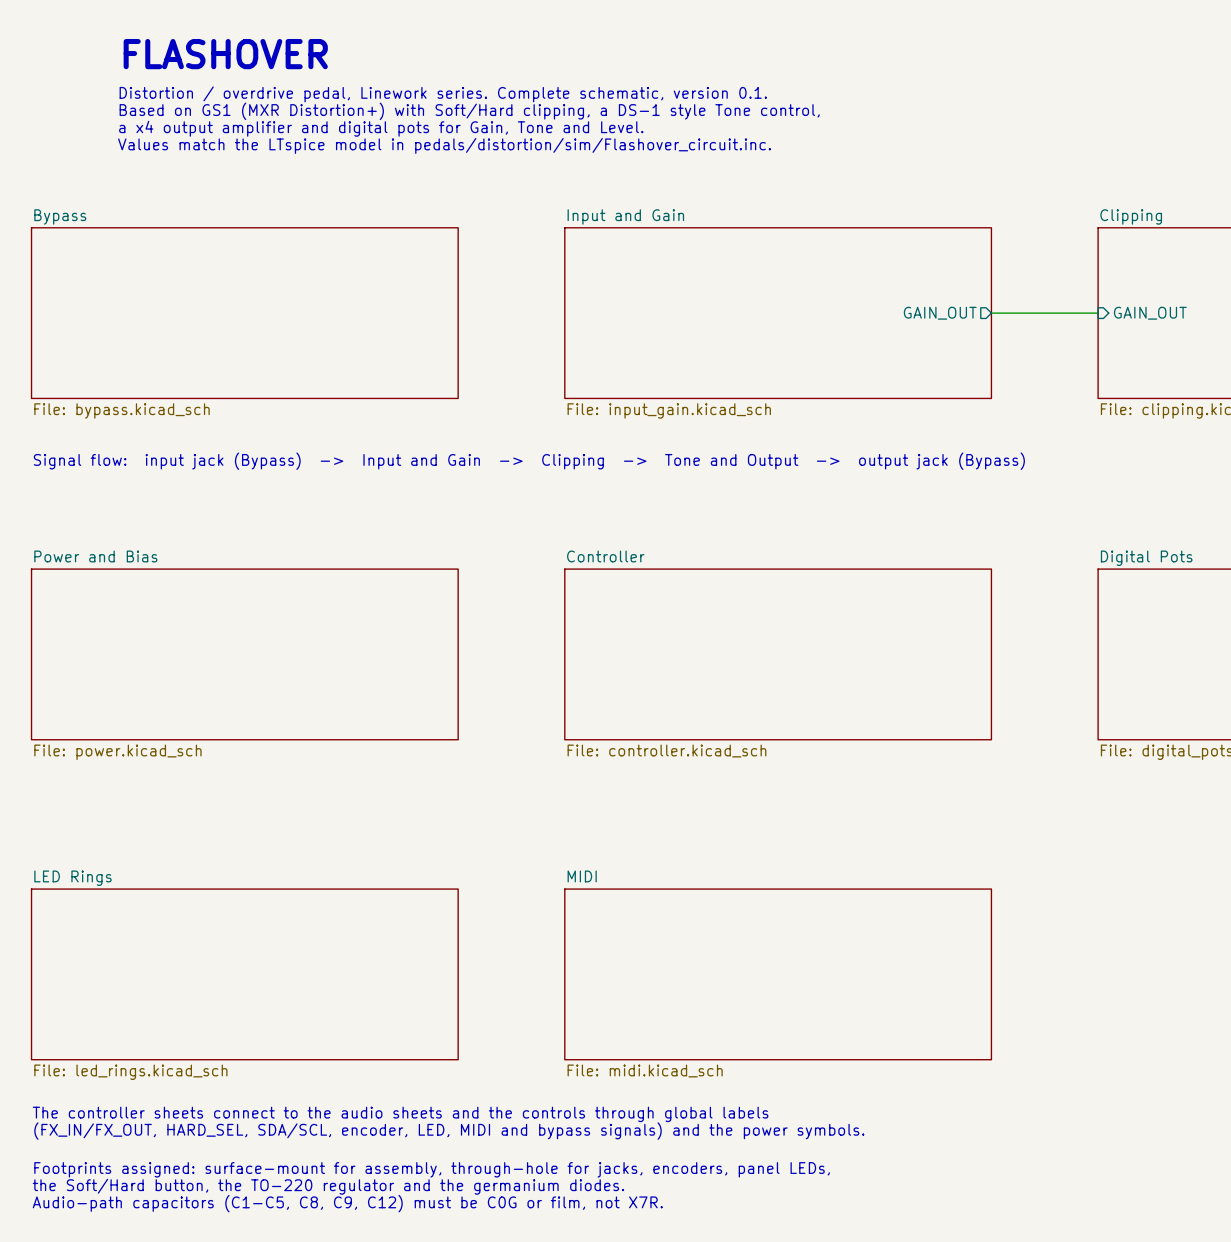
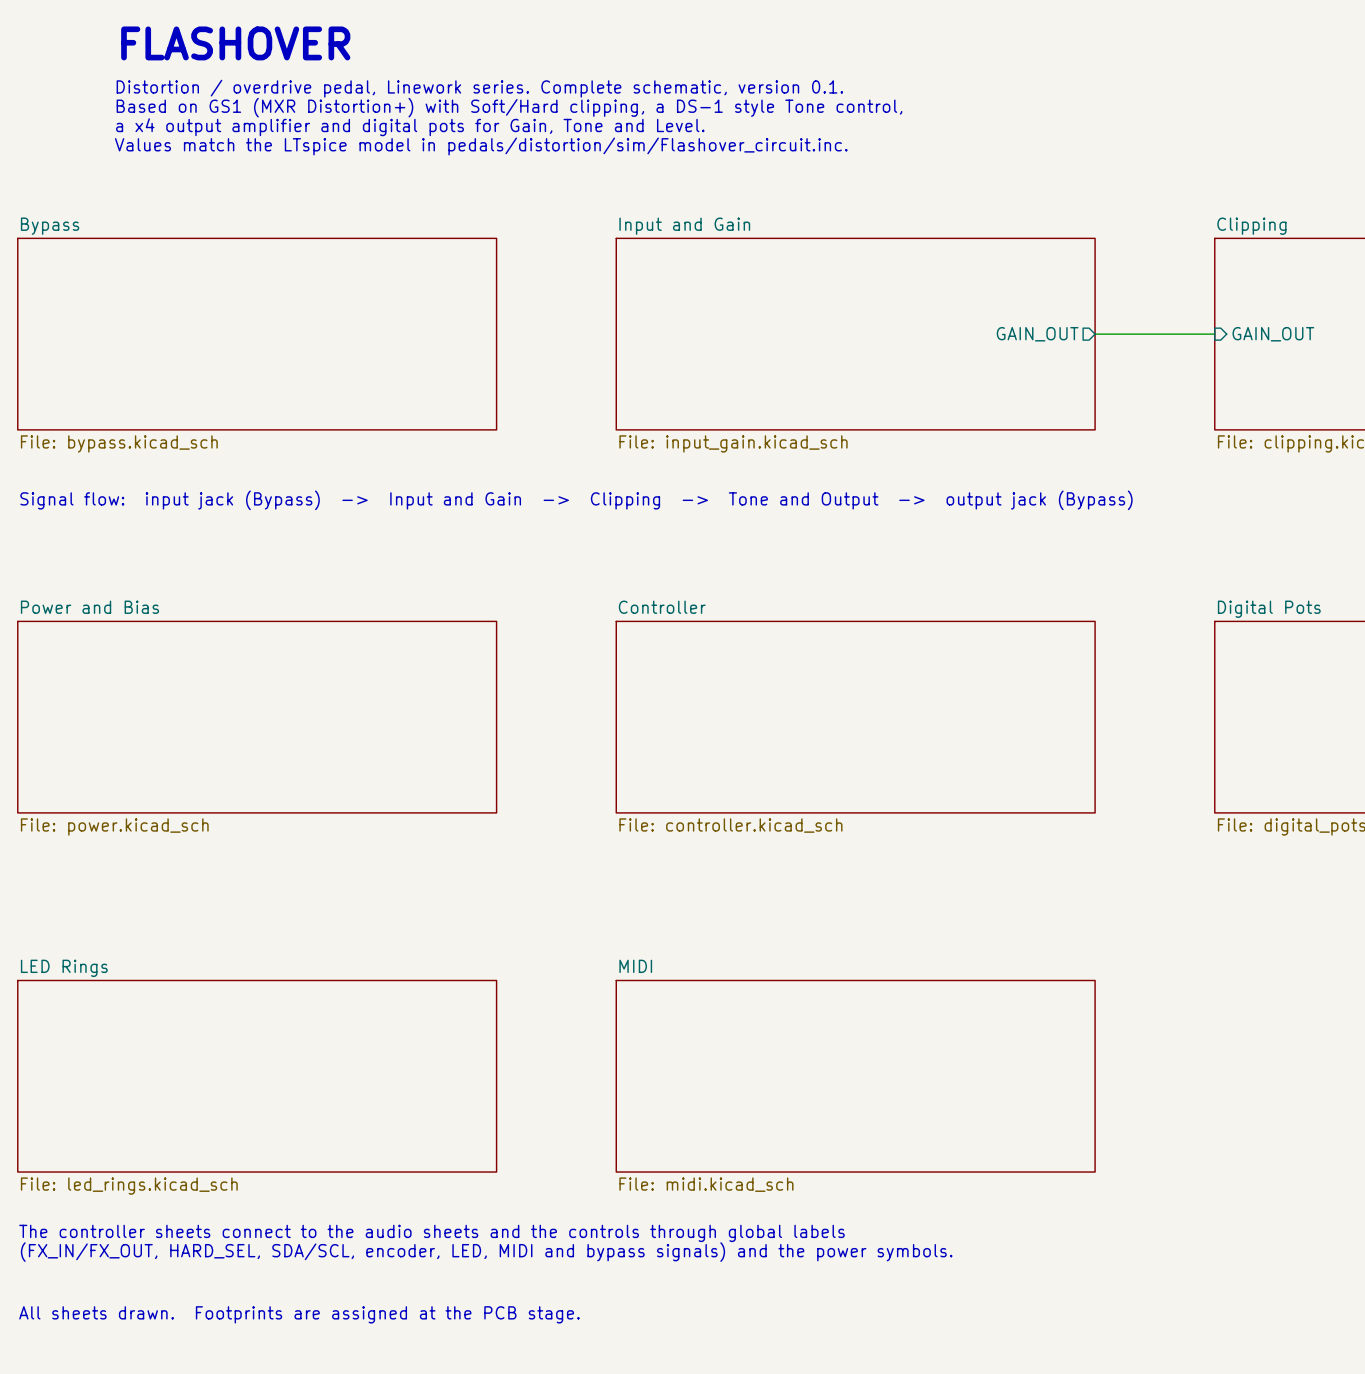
text: Footprints assigned: surface-mount for assembly, through-hole for jacks, encoders, panel LEDs, (432, 1169) -> none
text: the Soft/Hard button, the TO-220 regulator and the germanium diodes. (328, 1186) -> All sheets drawn. Footprints are assigned at the PCB stage. (299, 1314)
text: Audio-path capacitors (C1-C5, C8, C9, C12) must be C0G or film, not X7R. (347, 1203) -> none

